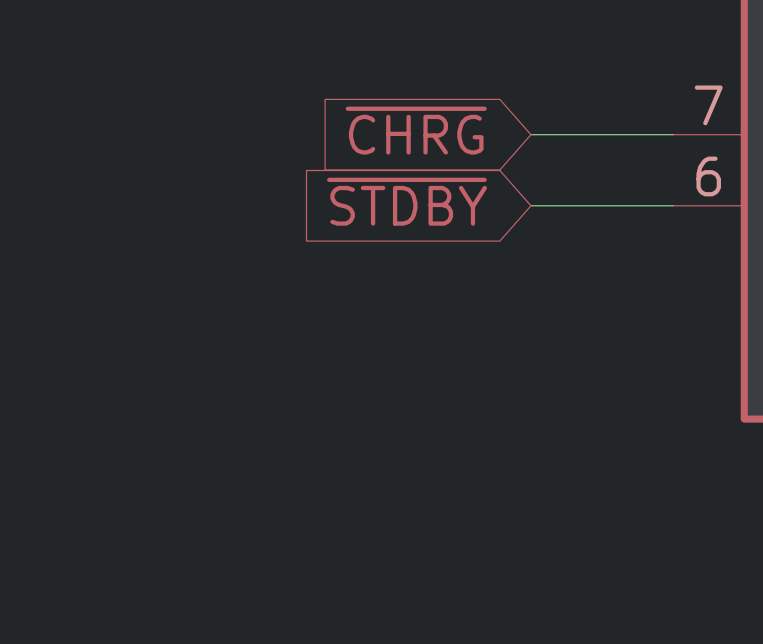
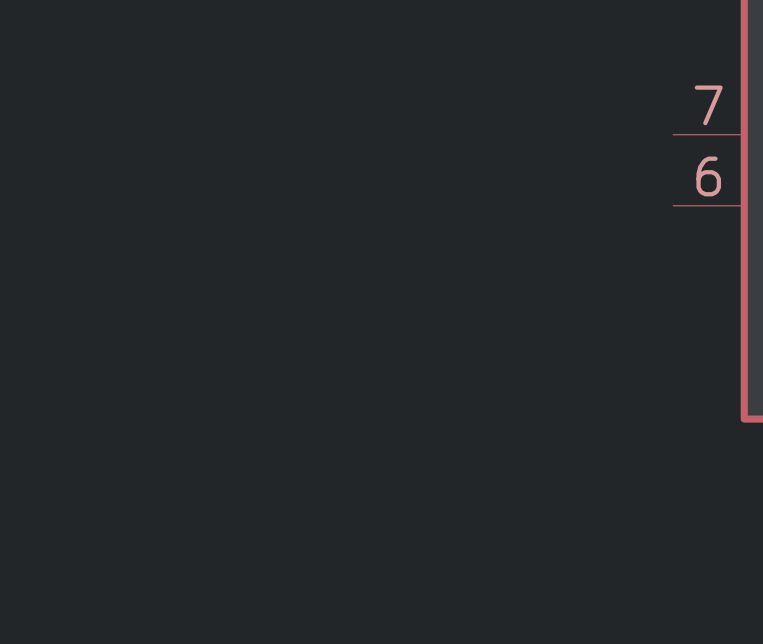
global label: ~{CHRG} (416, 130) -> none
wire: (530, 134) (673, 134) -> none
global label: ~{STDBY} (407, 201) -> none
wire: (530, 205) (673, 205) -> none

